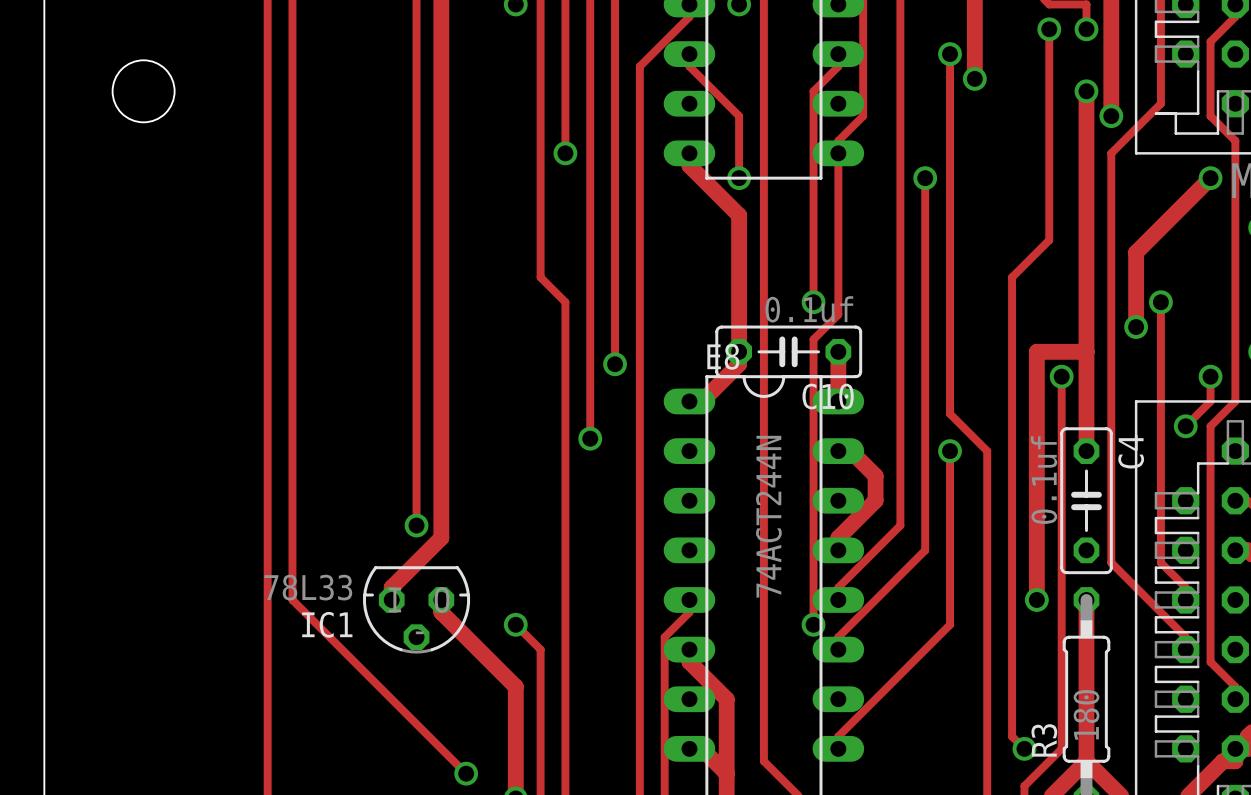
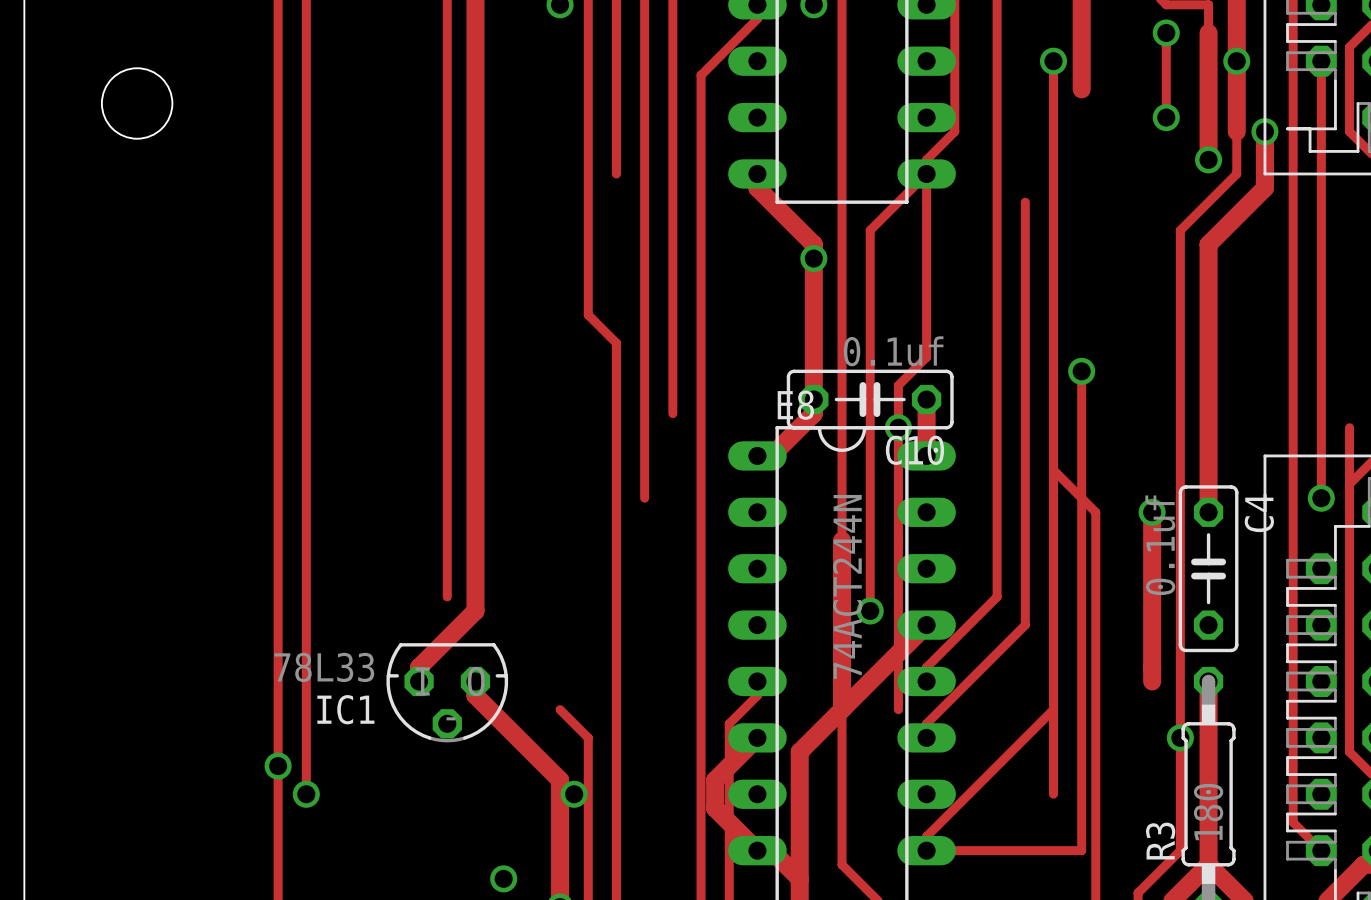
track: none -> (1208, 33) (1208, 103)
via: (1086, 29) -> none
track: (689, 54) (689, 66) (739, 116) (739, 178) -> none
track: (838, 54) (838, 66) (813, 91) (813, 302) -> none
via: none -> (1236, 61)
track: none -> (1321, 61) (1321, 498)
via: (974, 78) -> none
via: (1086, 91) -> none
track: (1049, 103) (1049, 240) (1012, 277) (1012, 736) (1024, 748) -> none
via: none -> (1166, 117)
track: (1160, 103) (1111, 153) (1111, 562) (1185, 637) (1185, 649) -> (1293, 117) (1293, 343)
track: none -> (1236, 131) (1236, 173) (1180, 230) (1180, 427)
via: (1111, 116) -> none
via: none -> (1264, 131)
track: (1086, 140) (1086, 215) -> (1264, 131) (1264, 188) (1208, 244)
via: none -> (1208, 159)
via: (565, 153) -> none
track: none -> (926, 173) (870, 230) (870, 611)
via position: (739, 178) -> (813, 258)
via: (925, 178) -> none
track: (1210, 178) (1136, 252) (1136, 327) -> none
via: (1210, 178) -> none
via: (813, 302) -> none
via: (1160, 302) -> none
track: none -> (1081, 371) (1081, 850) (926, 850)
via: none -> (1081, 371)
via: (1136, 327) -> none
track: (1086, 351) (1036, 351) (1036, 451) -> none
via: (615, 364) -> none
via: none -> (898, 427)
via: (1061, 376) -> none
via: (1210, 376) -> none
track: (1210, 401) (1185, 426) -> (1349, 455) (1349, 484)
via position: (1185, 426) -> (1321, 498)
via: (590, 438) -> none
track: (838, 451) (850, 451) (875, 475) (875, 500) (838, 537) (838, 550) -> (799, 794) (799, 751) (926, 625)
via: (950, 451) -> none
via: none -> (1152, 512)
track width: thin (763, 475) (763, 624) -> thick (842, 540) (842, 709)
via: (416, 525) -> none
track: (1160, 562) (1185, 587) (1185, 599) -> (1293, 639) (1293, 822) (1321, 850)
track: (292, 599) (466, 773) -> (306, 681) (306, 794)
via: (1036, 599) -> none
via position: (515, 624) -> (574, 794)
via position: (813, 624) -> (870, 611)
track: (689, 649) (689, 662) (726, 699) -> (757, 737) (715, 780) (715, 808) (757, 850)
via: none -> (1180, 737)
via: none -> (278, 766)
via: none -> (306, 794)
via: (1024, 748) -> none

